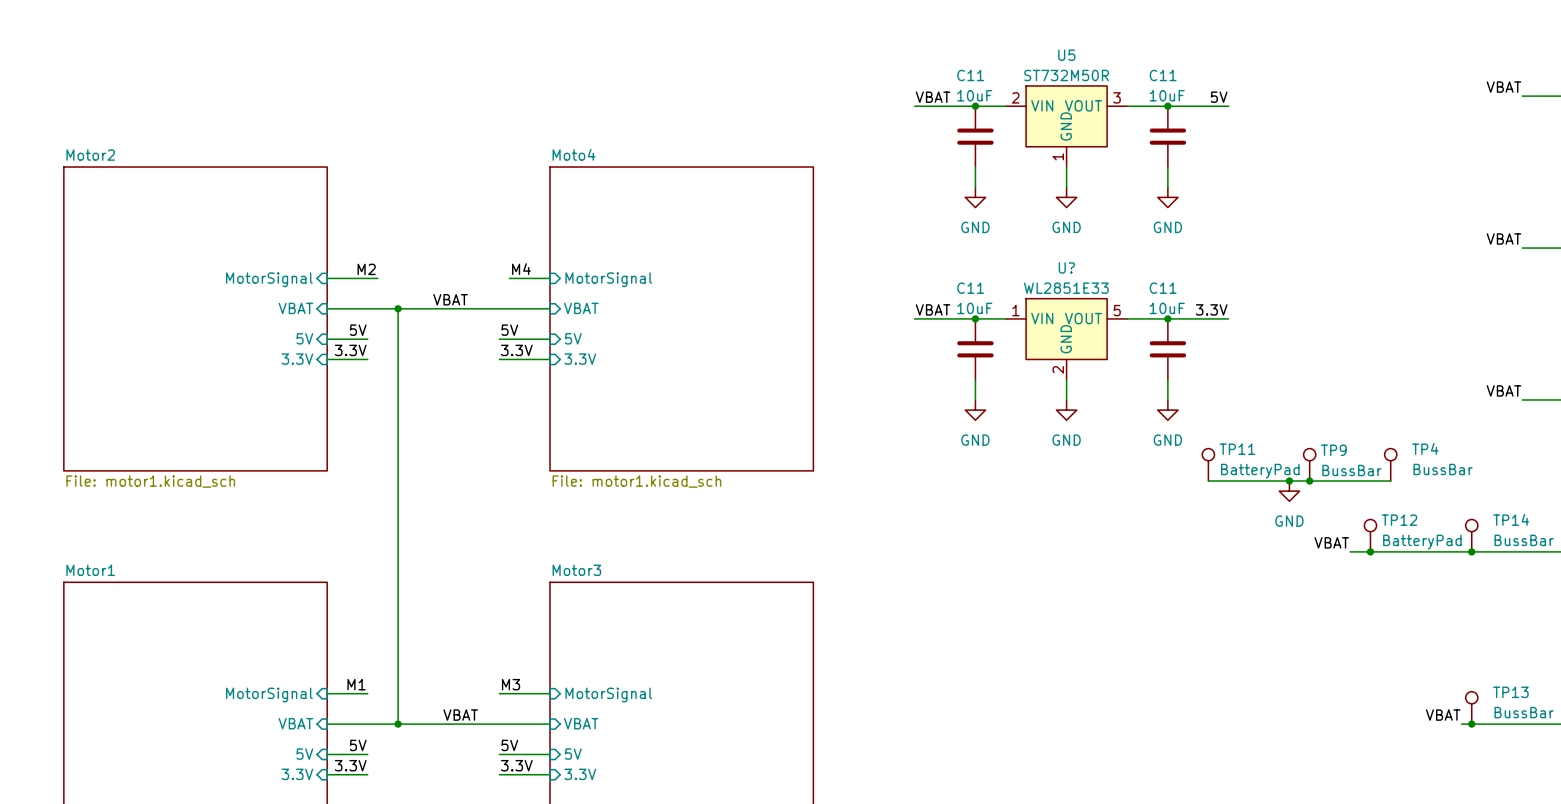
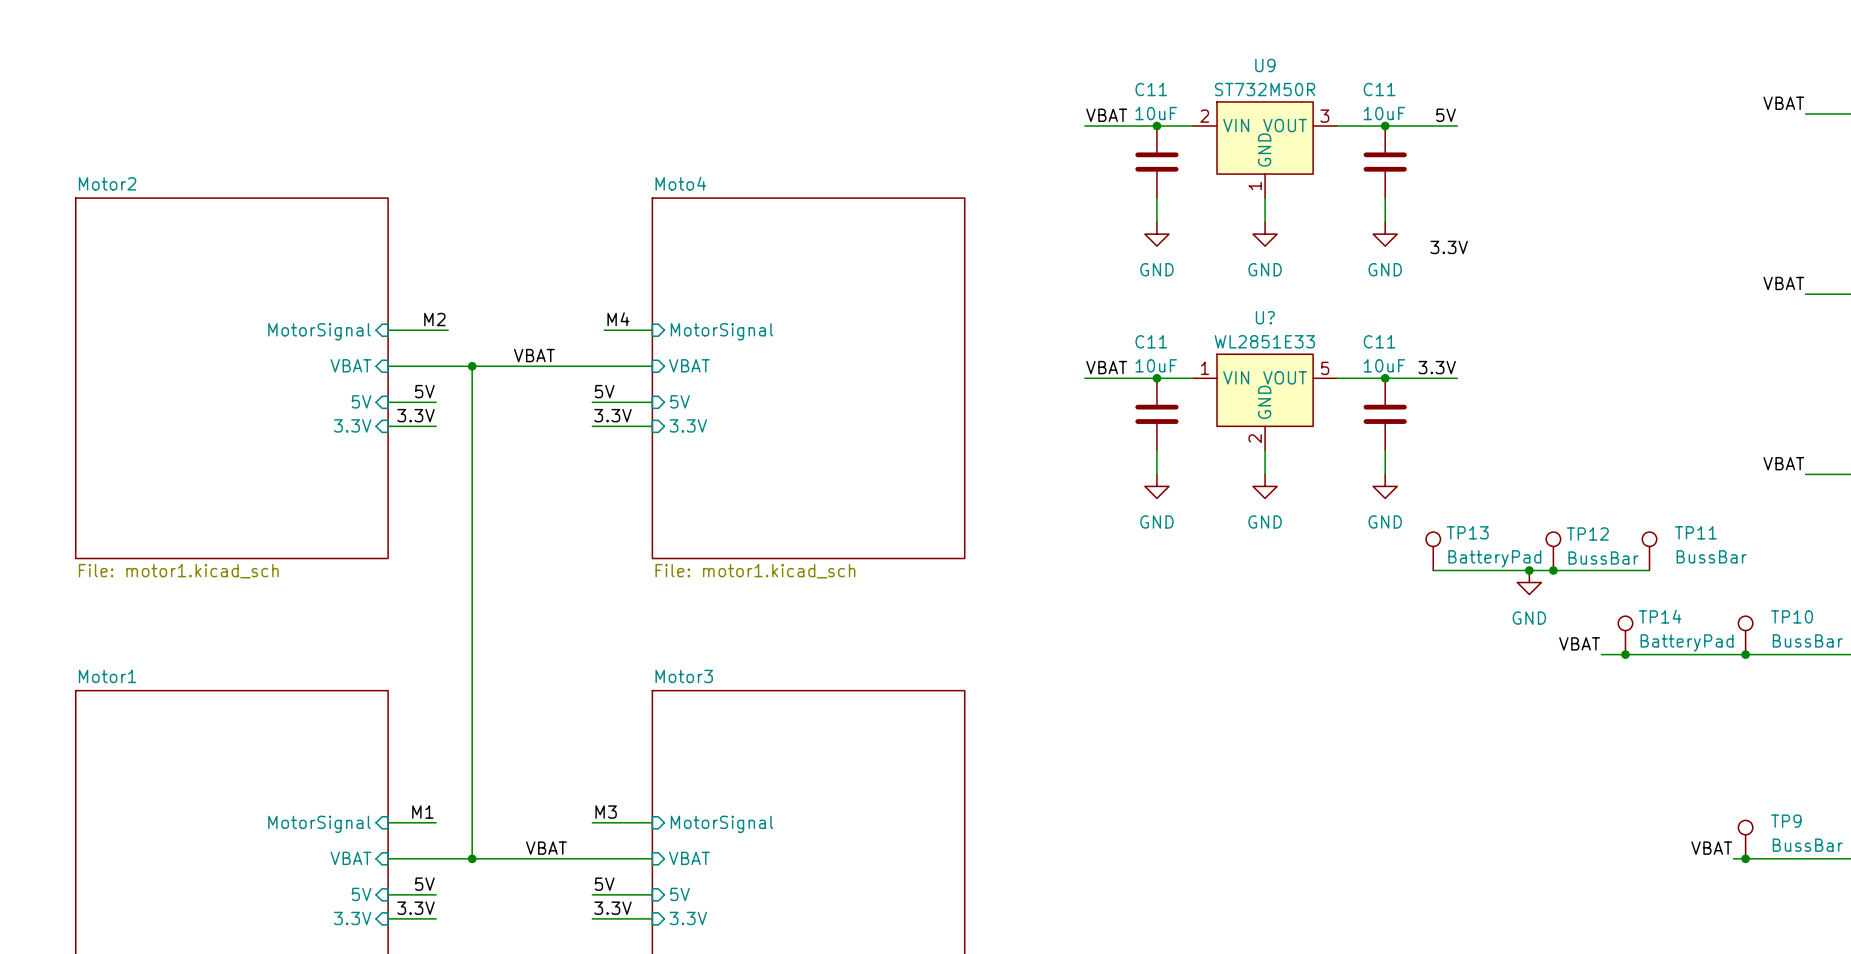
U5 name: U5 (1066, 55) -> U9 (1265, 65)
label: none -> 3.3V (1449, 247)
TP4 name: TP4 (1425, 448) -> TP11 (1695, 532)
TP11 name: TP11 (1237, 449) -> TP13 (1467, 532)
TP9 name: TP9 (1333, 450) -> TP12 (1587, 534)
TP14 name: TP14 (1511, 519) -> TP10 (1792, 616)
TP12 name: TP12 (1399, 520) -> TP14 (1660, 616)
TP13 name: TP13 (1510, 692) -> TP9 (1786, 821)

